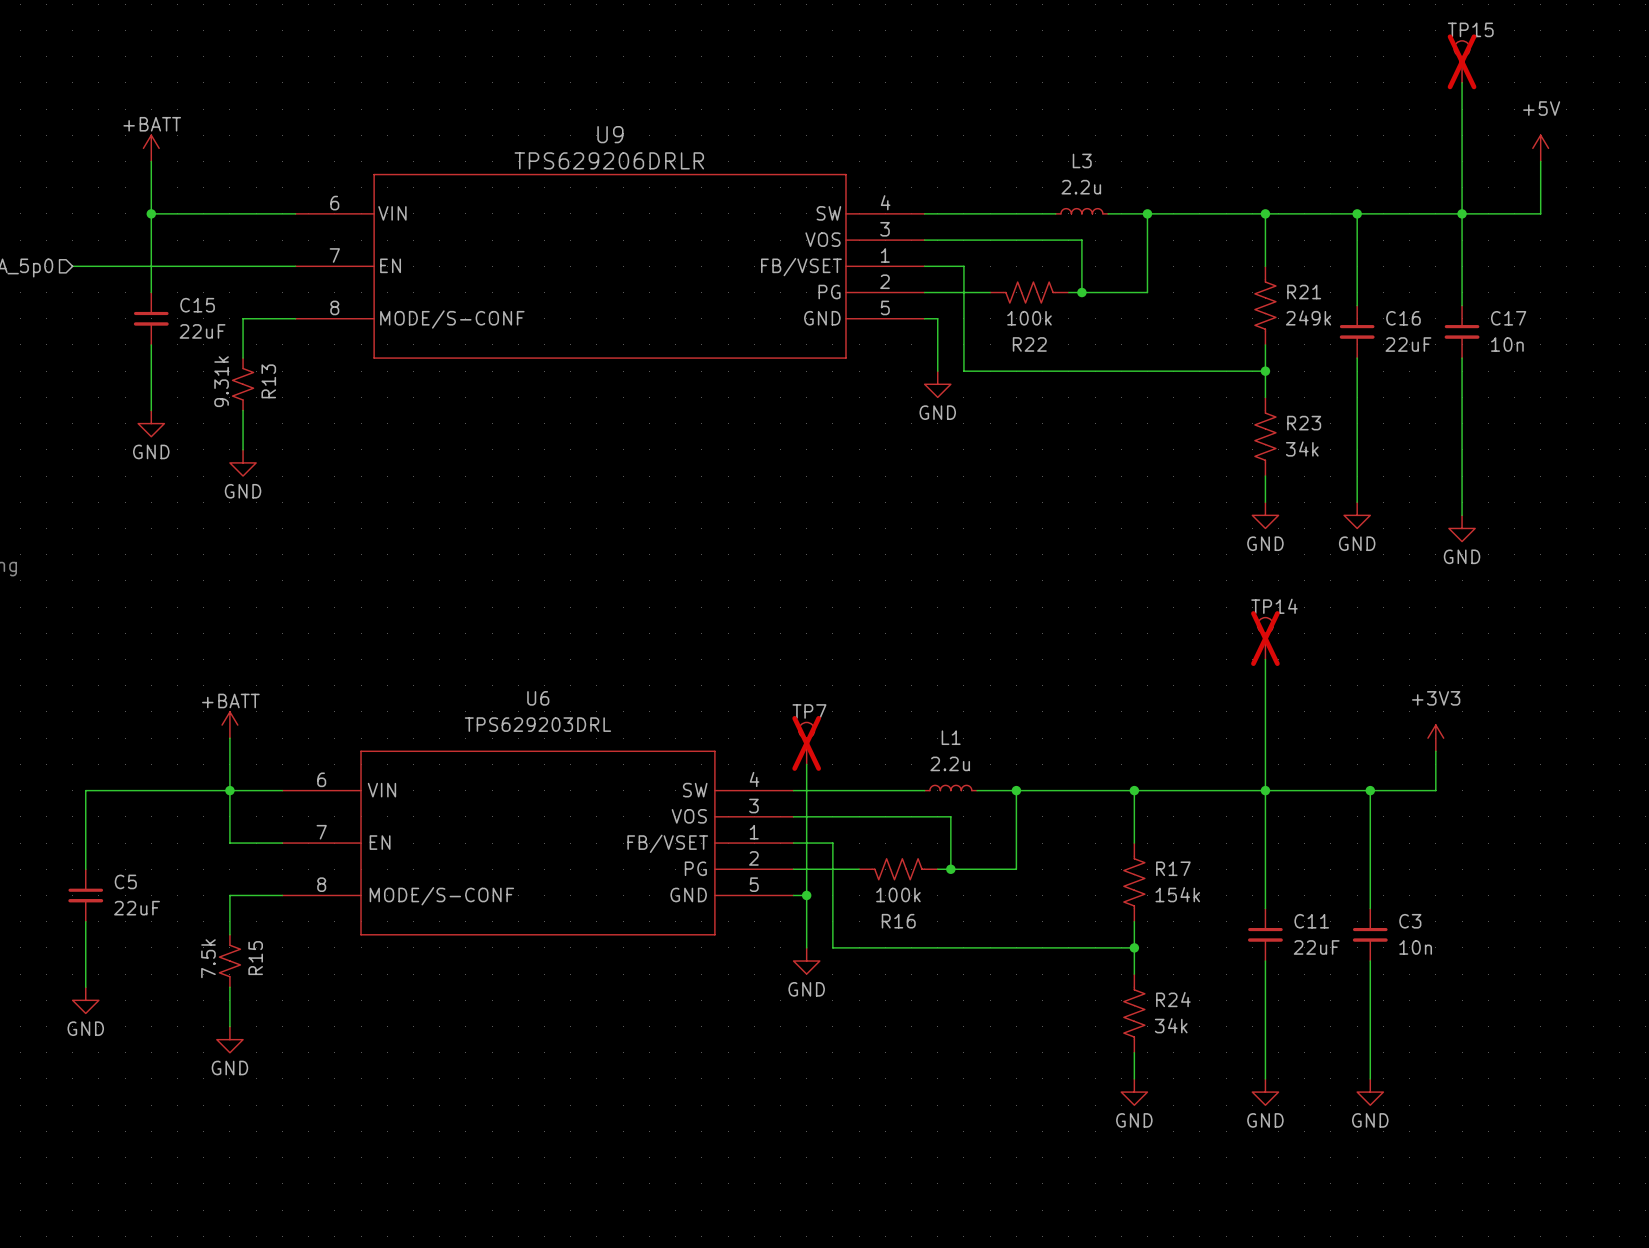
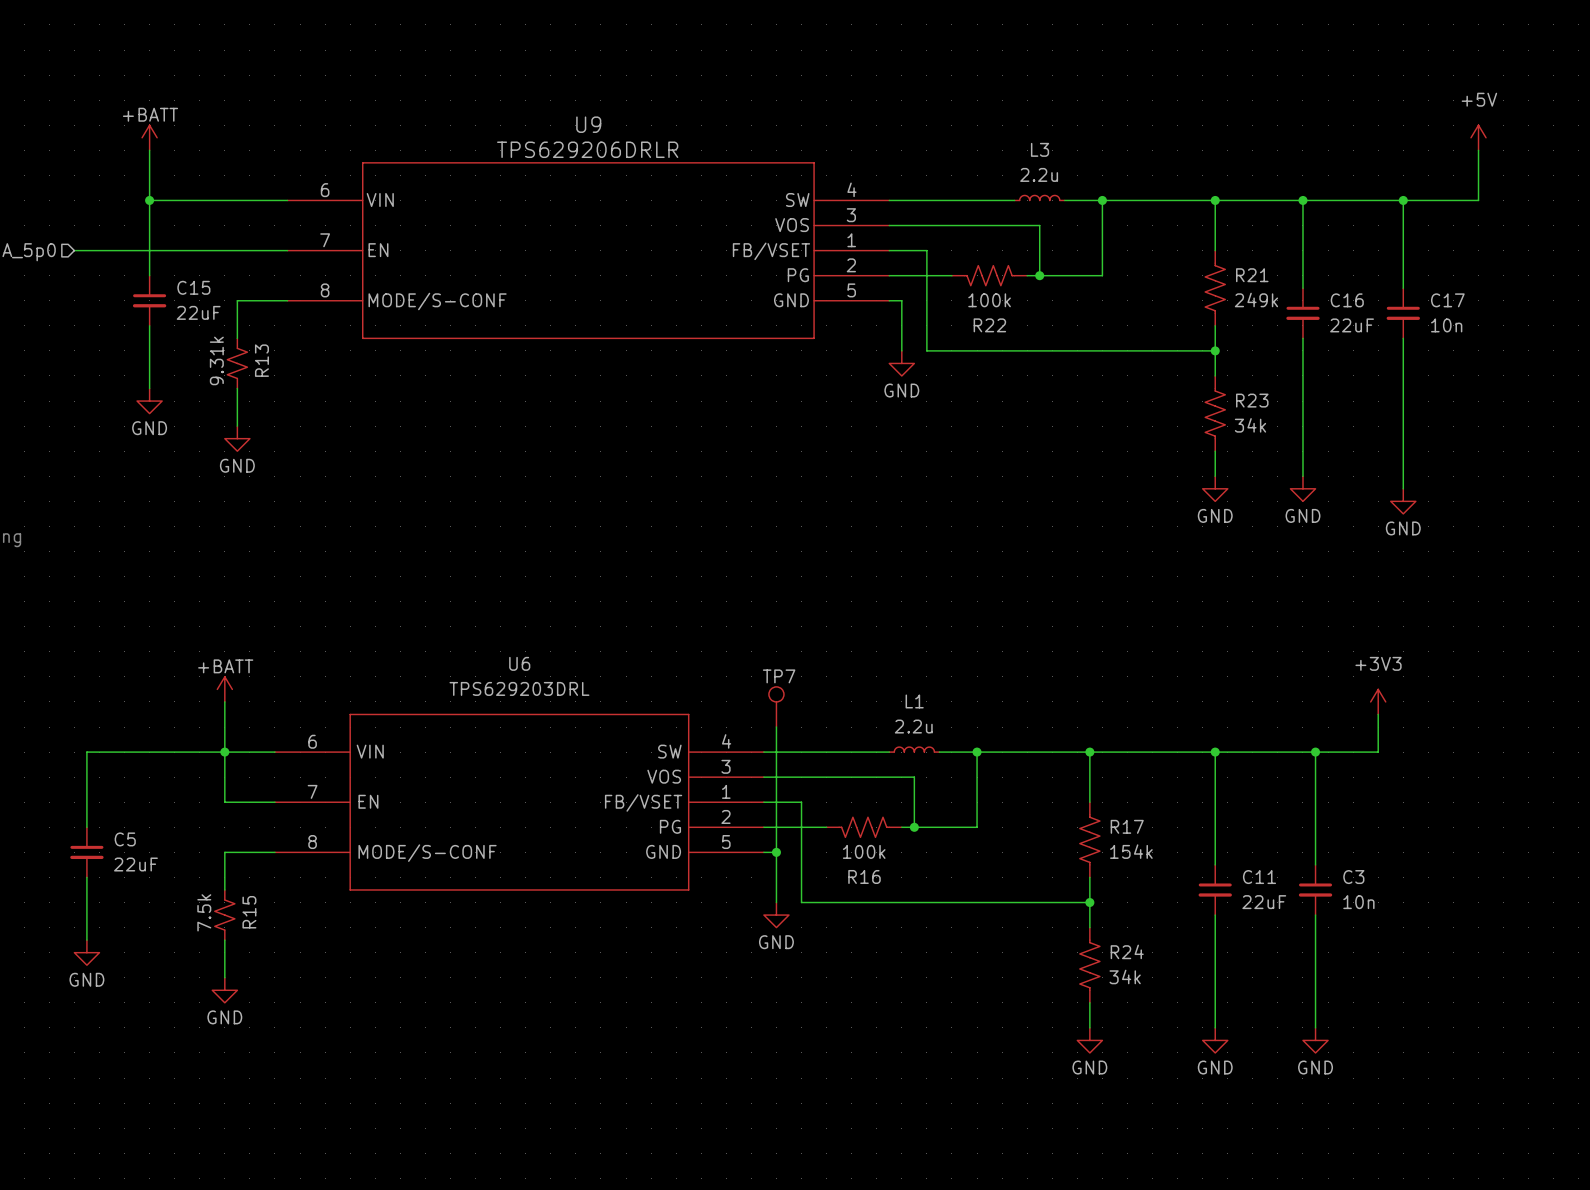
TP15: (1462, 61) -> none
wire: (1462, 82) (1462, 213) -> none
TP14: (1265, 638) -> none
wire: (1265, 659) (1265, 790) -> none
TP7 do-not-place cross: (806, 743) -> none

